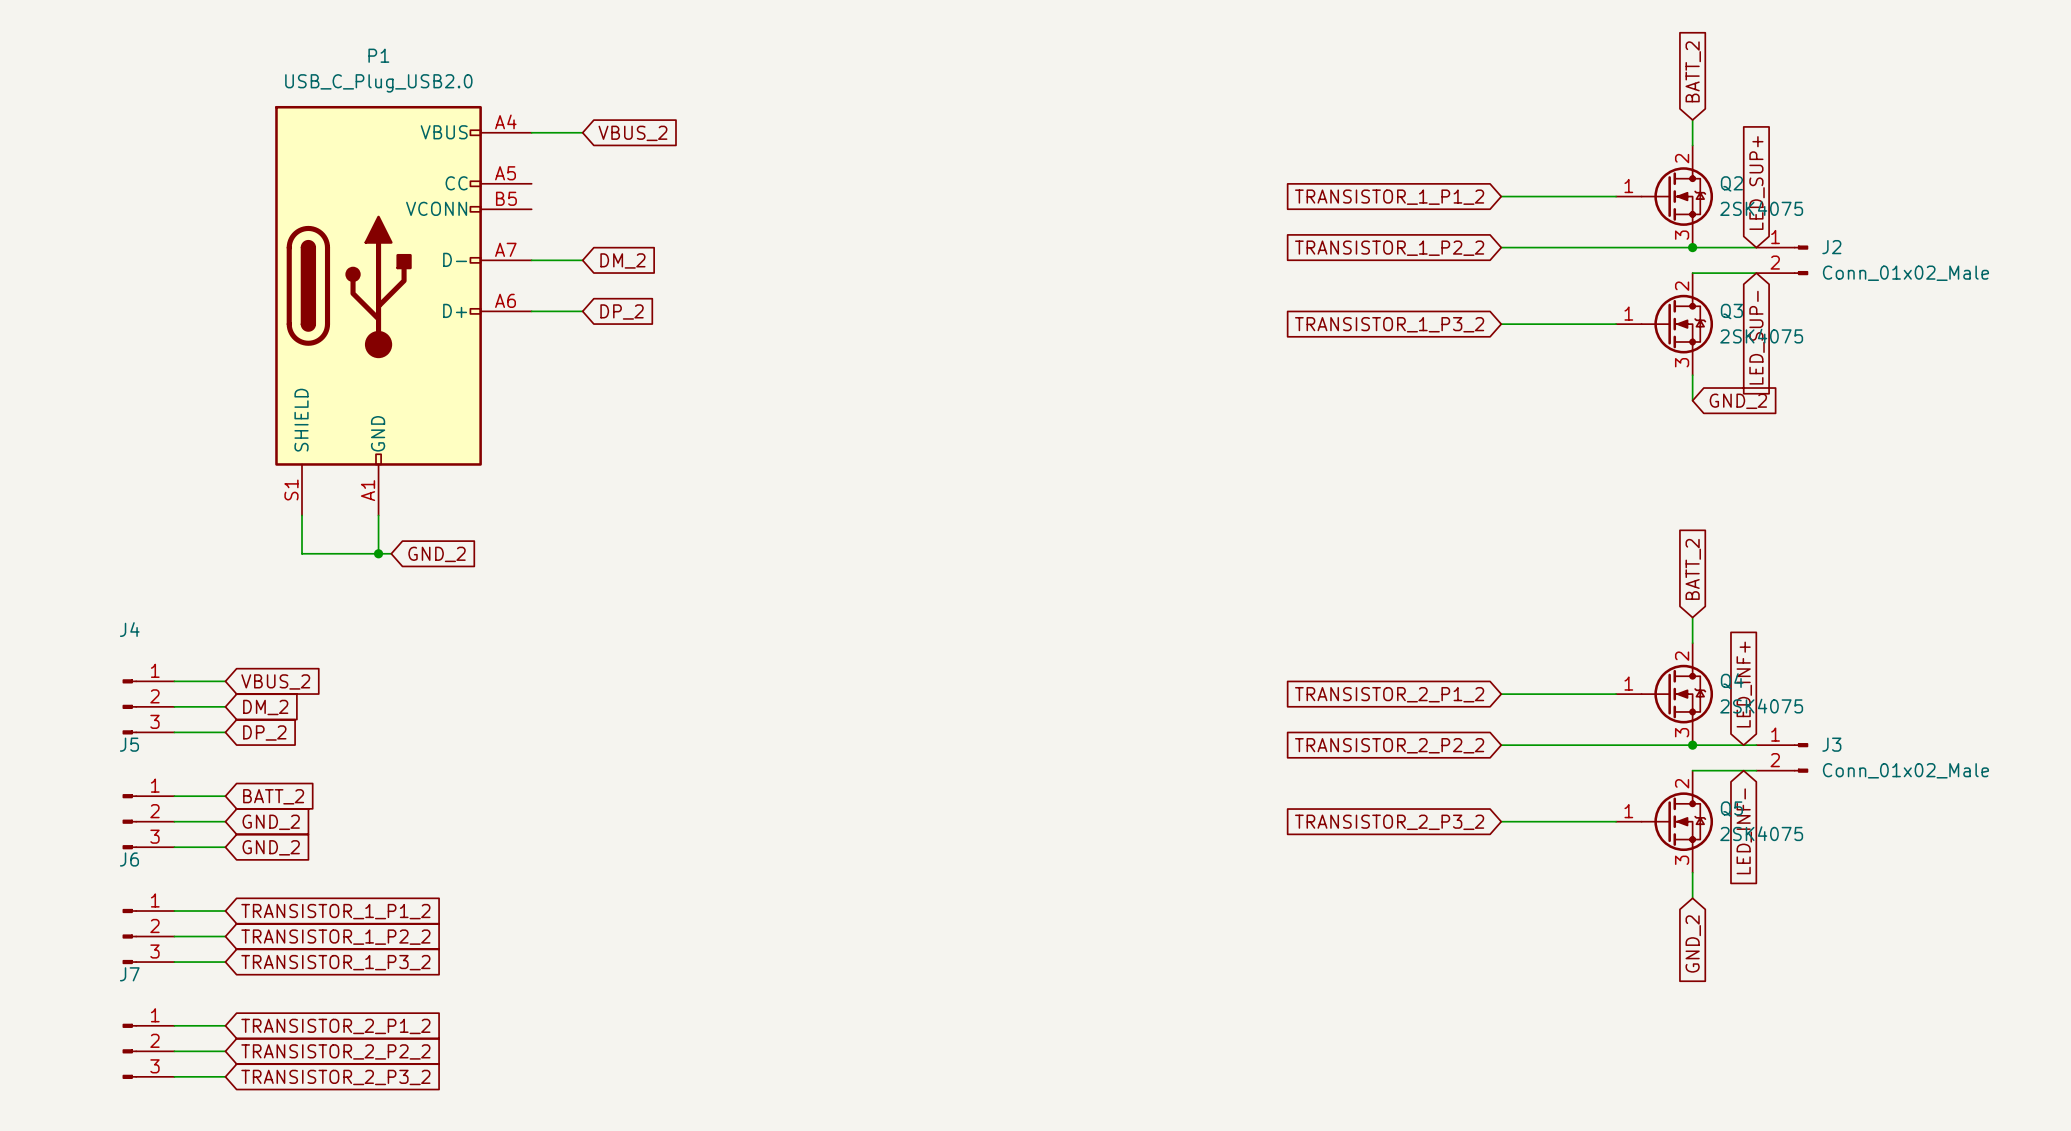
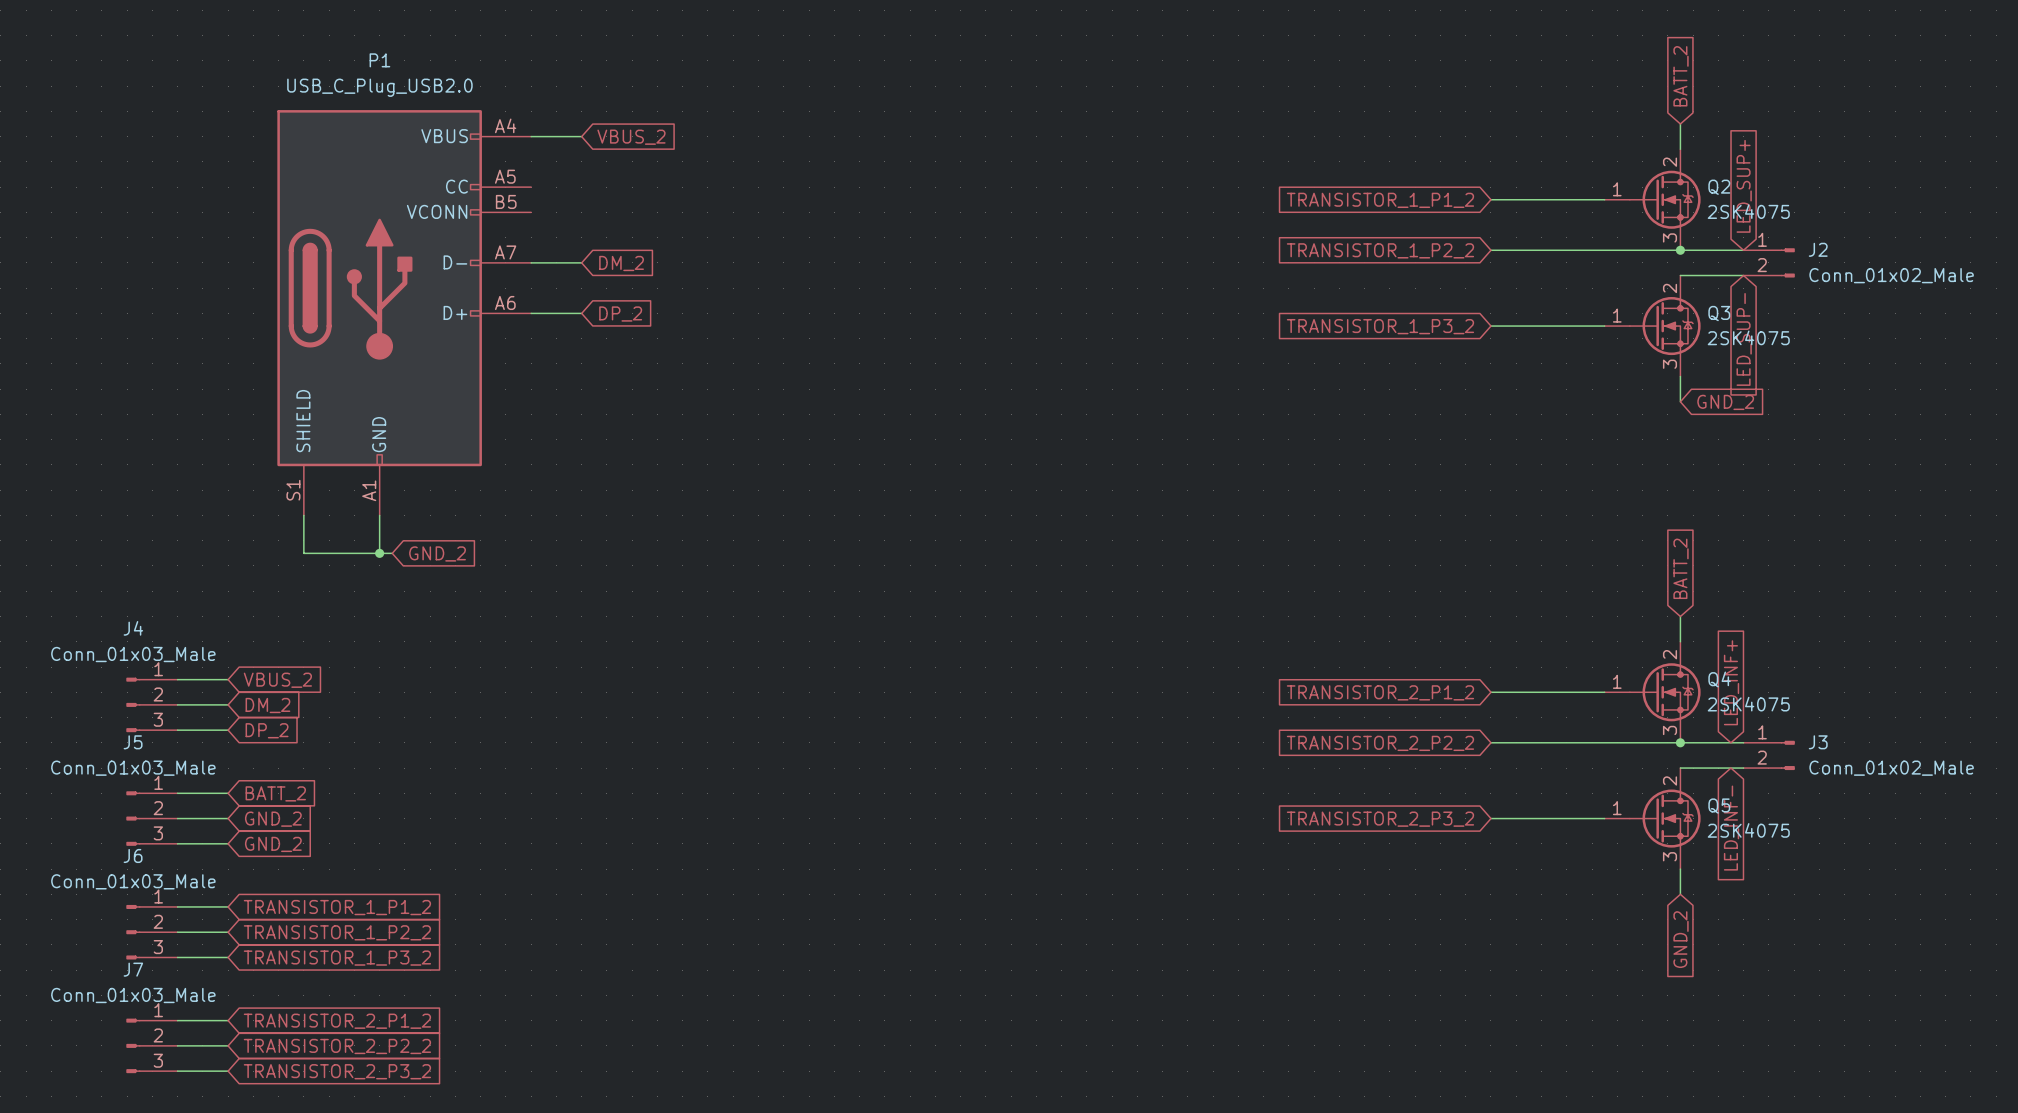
J4 value: none -> Conn_01x03_Male (133, 654)
J5 value: none -> Conn_01x03_Male (133, 768)
J6 value: none -> Conn_01x03_Male (133, 881)
J7 value: none -> Conn_01x03_Male (133, 995)

